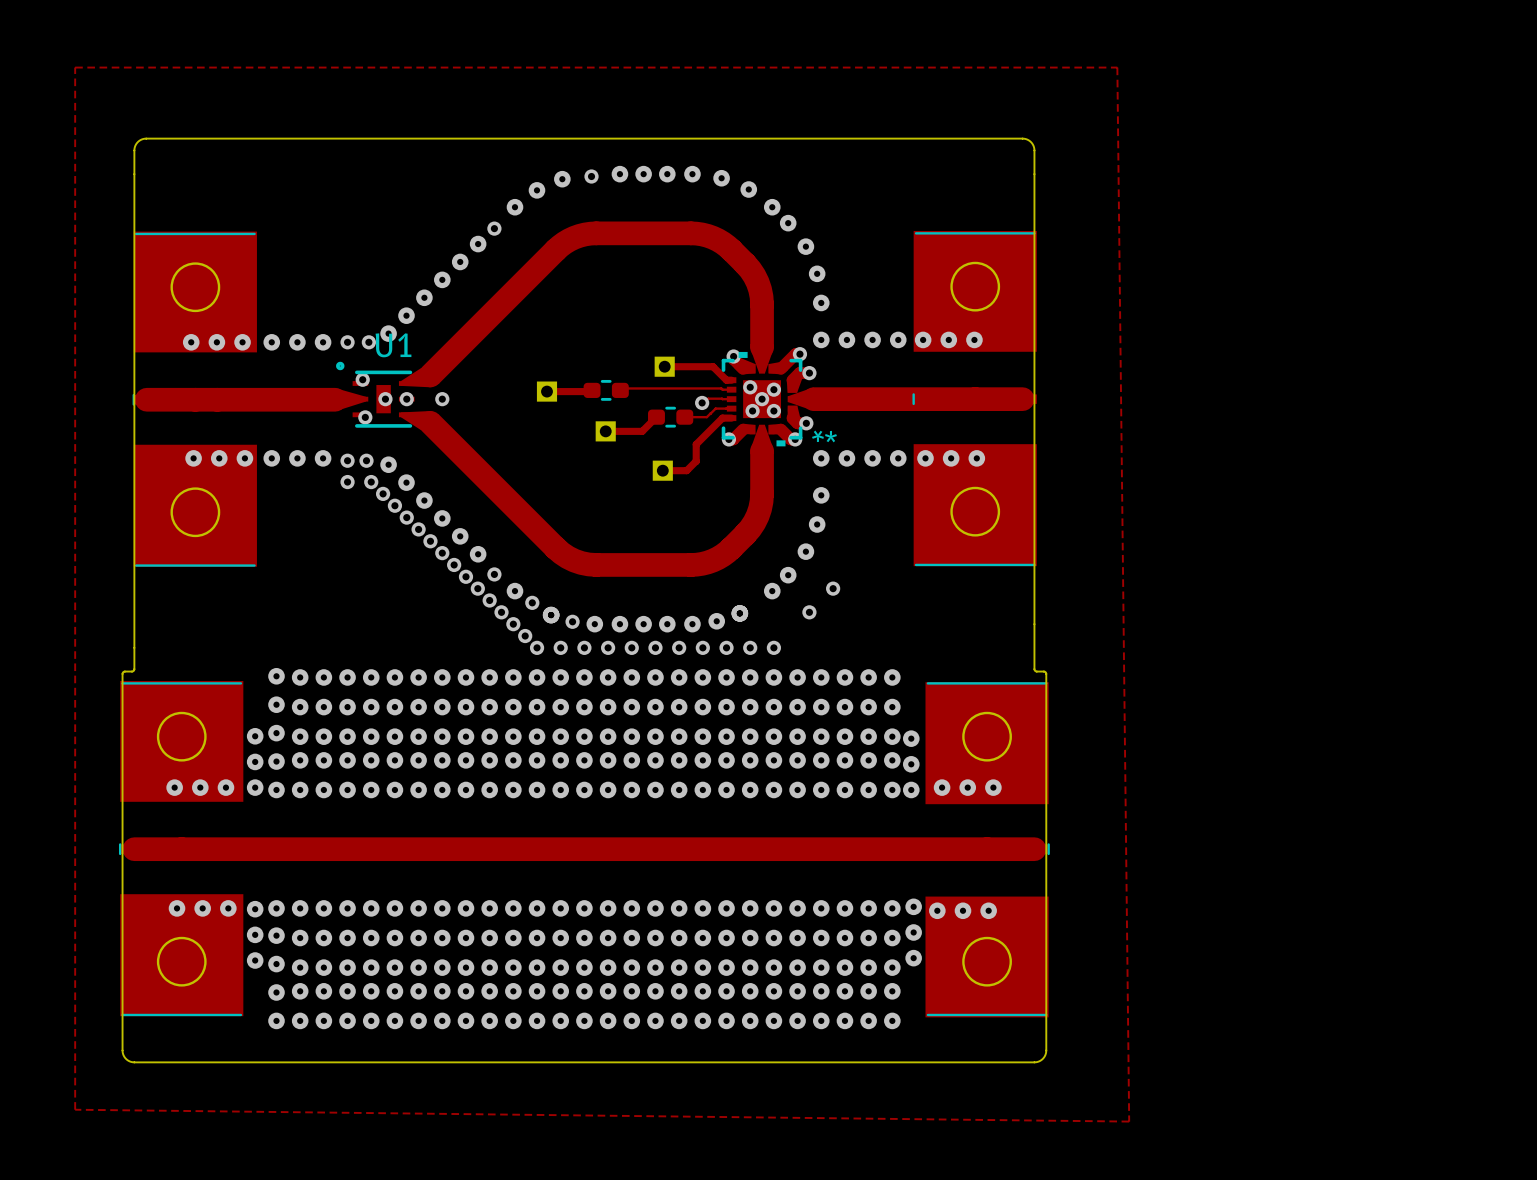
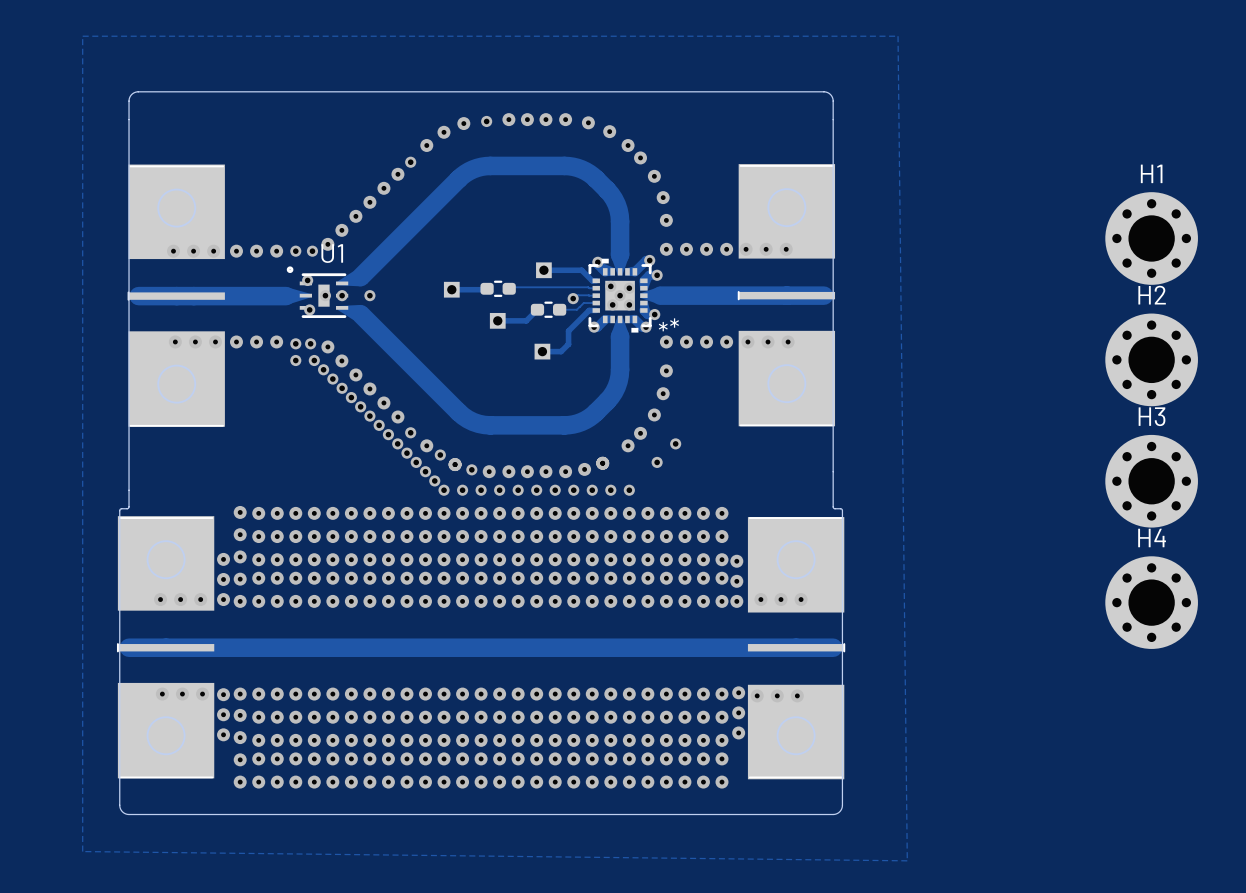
H1: none -> (1151, 238)
H2: none -> (1151, 359)
H3: none -> (1151, 481)
H4: none -> (1151, 602)

